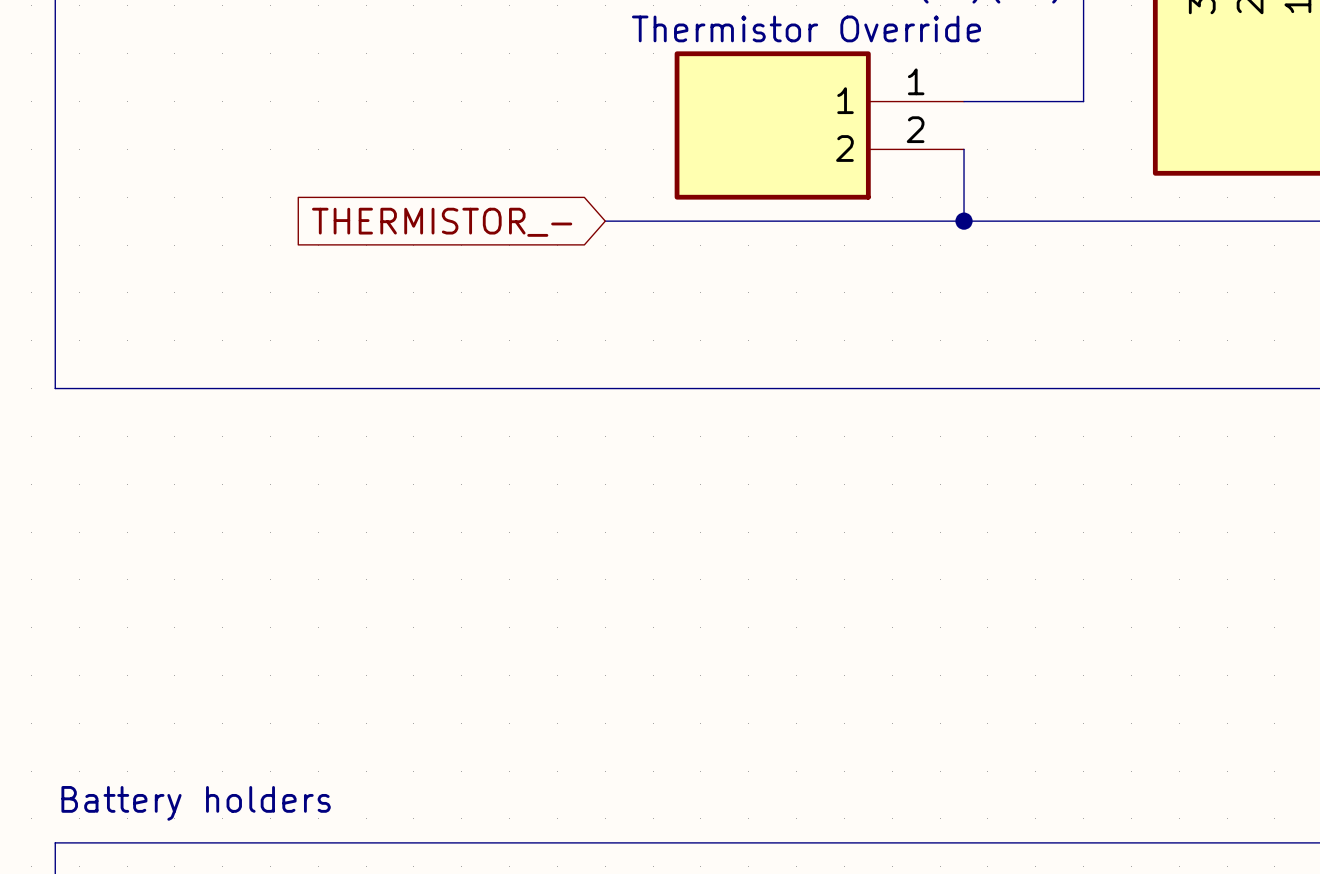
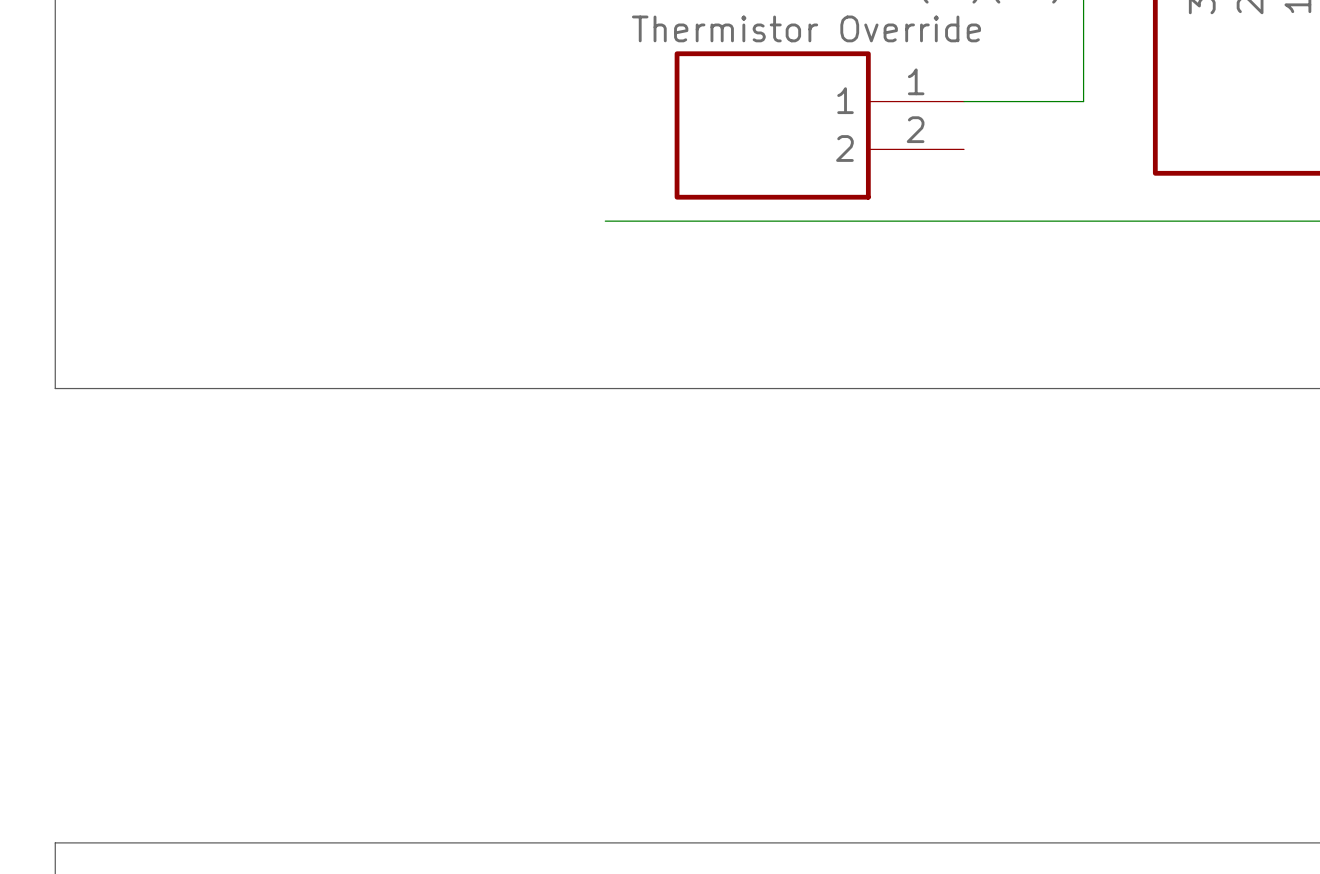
wire: (964, 149) (964, 221) -> none
junction: (964, 221) -> none
global label: THERMISTOR_- (442, 222) -> none
text: Battery holders (196, 803) -> none

